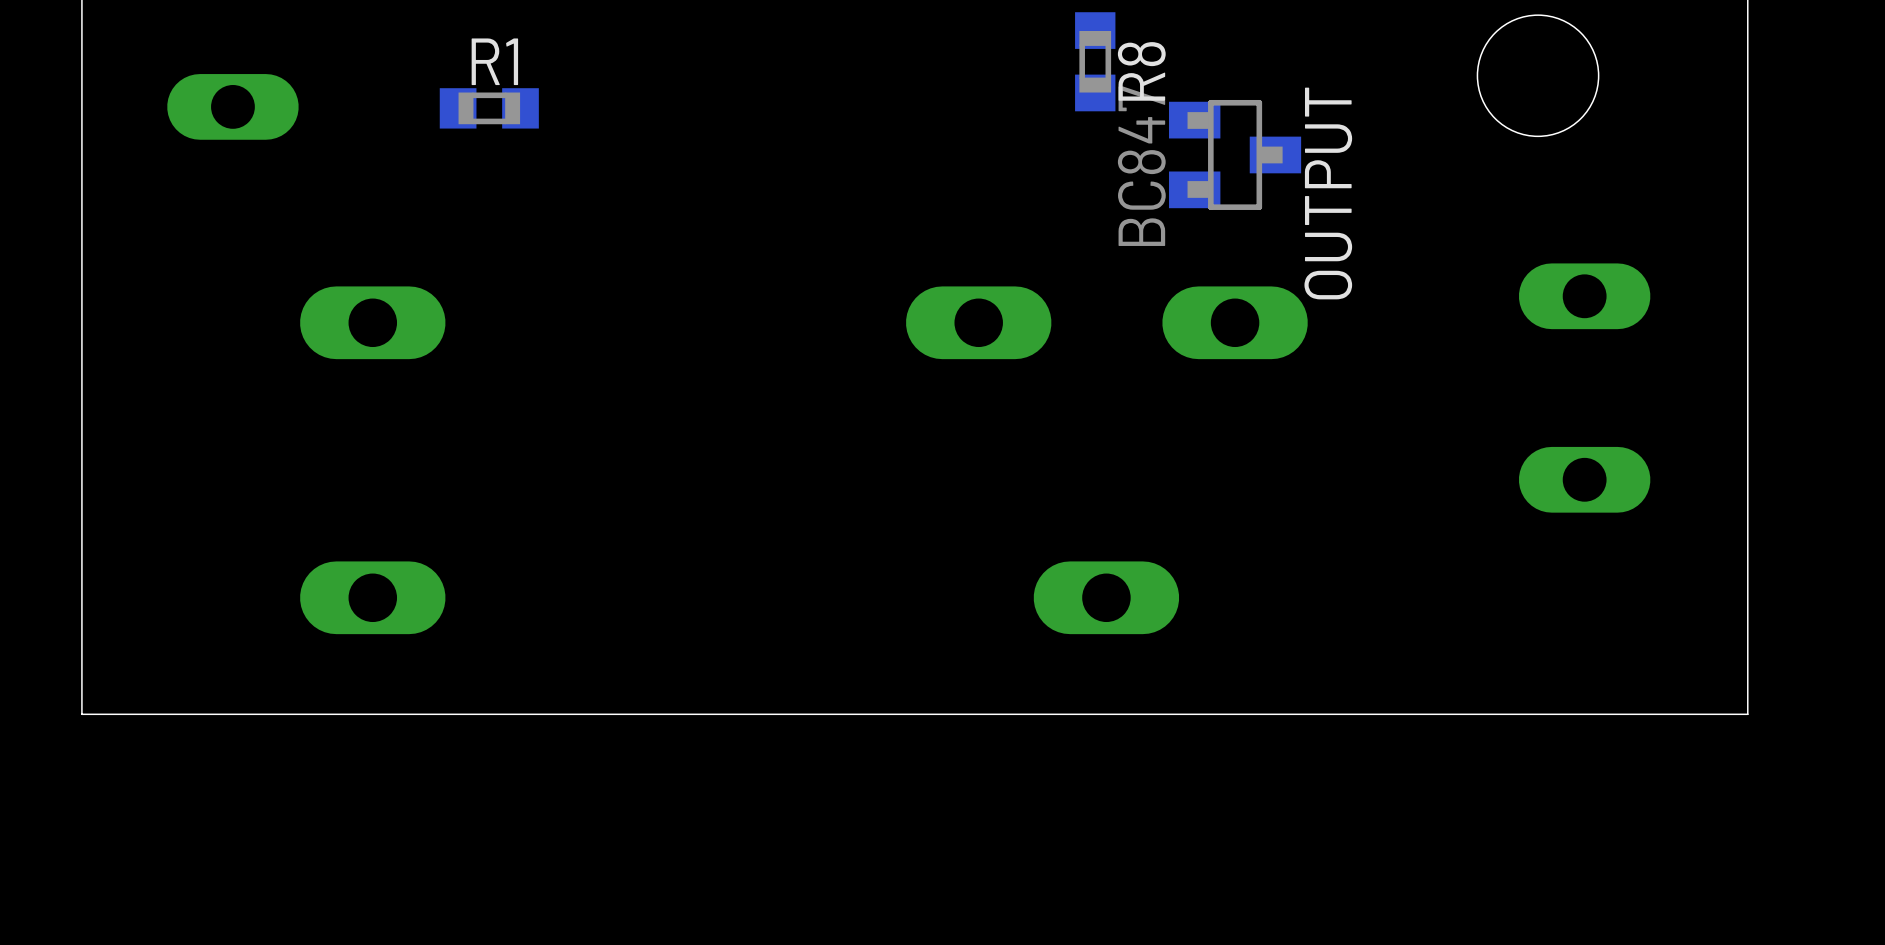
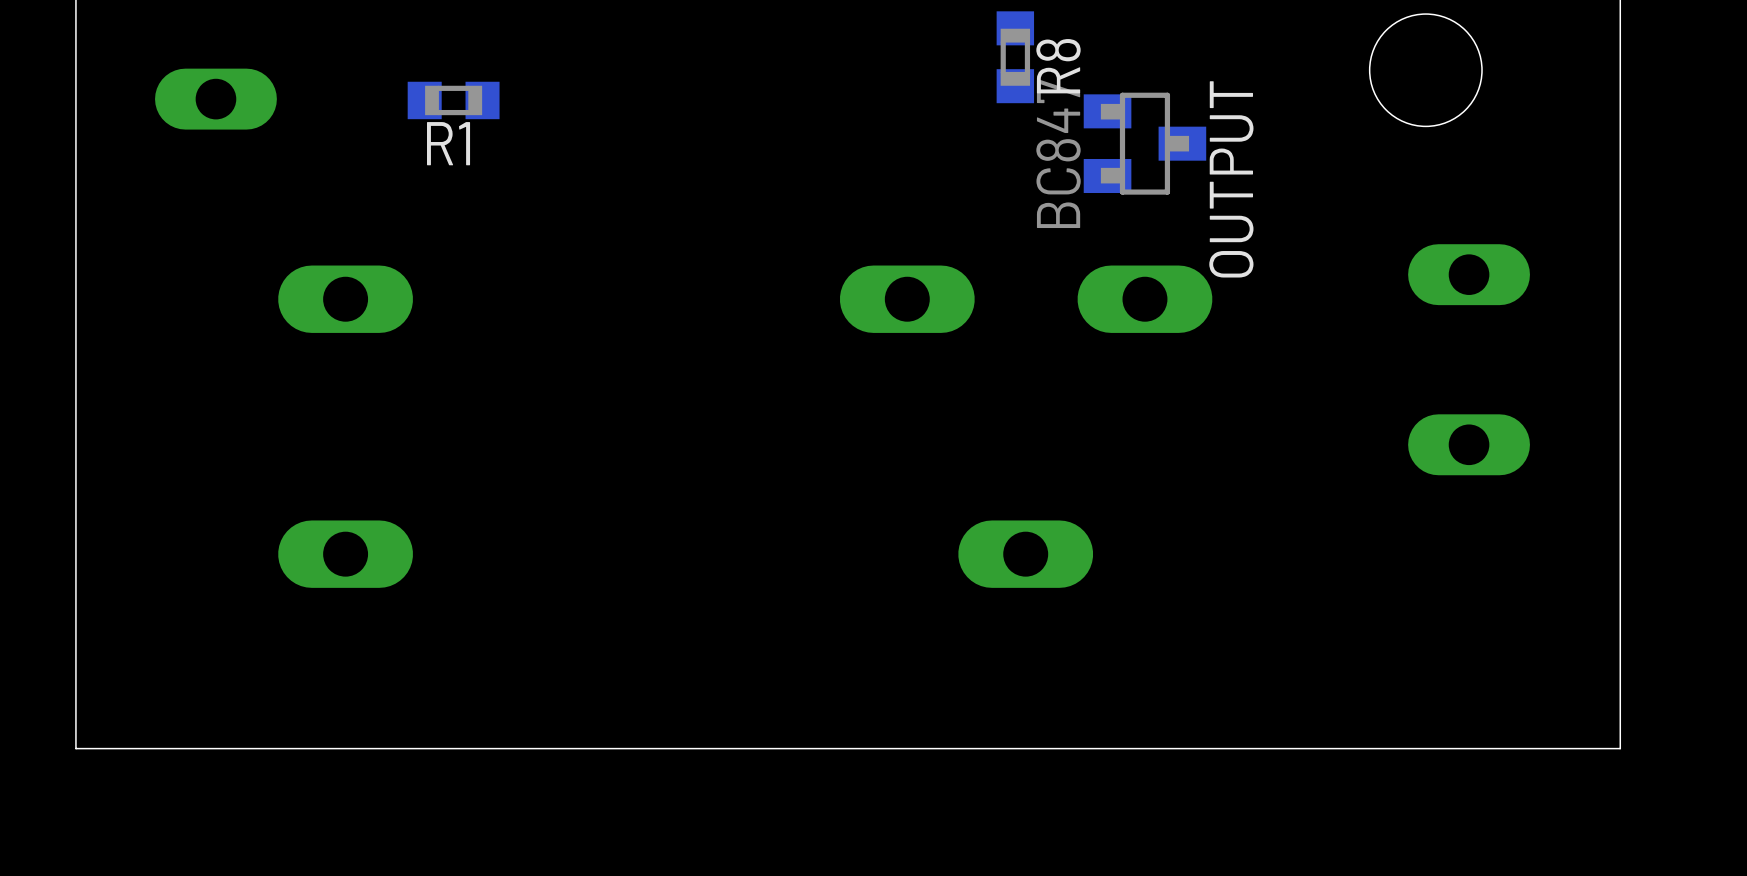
R1 name position: R1 (494, 61) -> R1 (448, 143)
board edge: (1747, 714) (81, 714) -> (1620, 662) (1620, 748) (75, 748) (75, 662)

